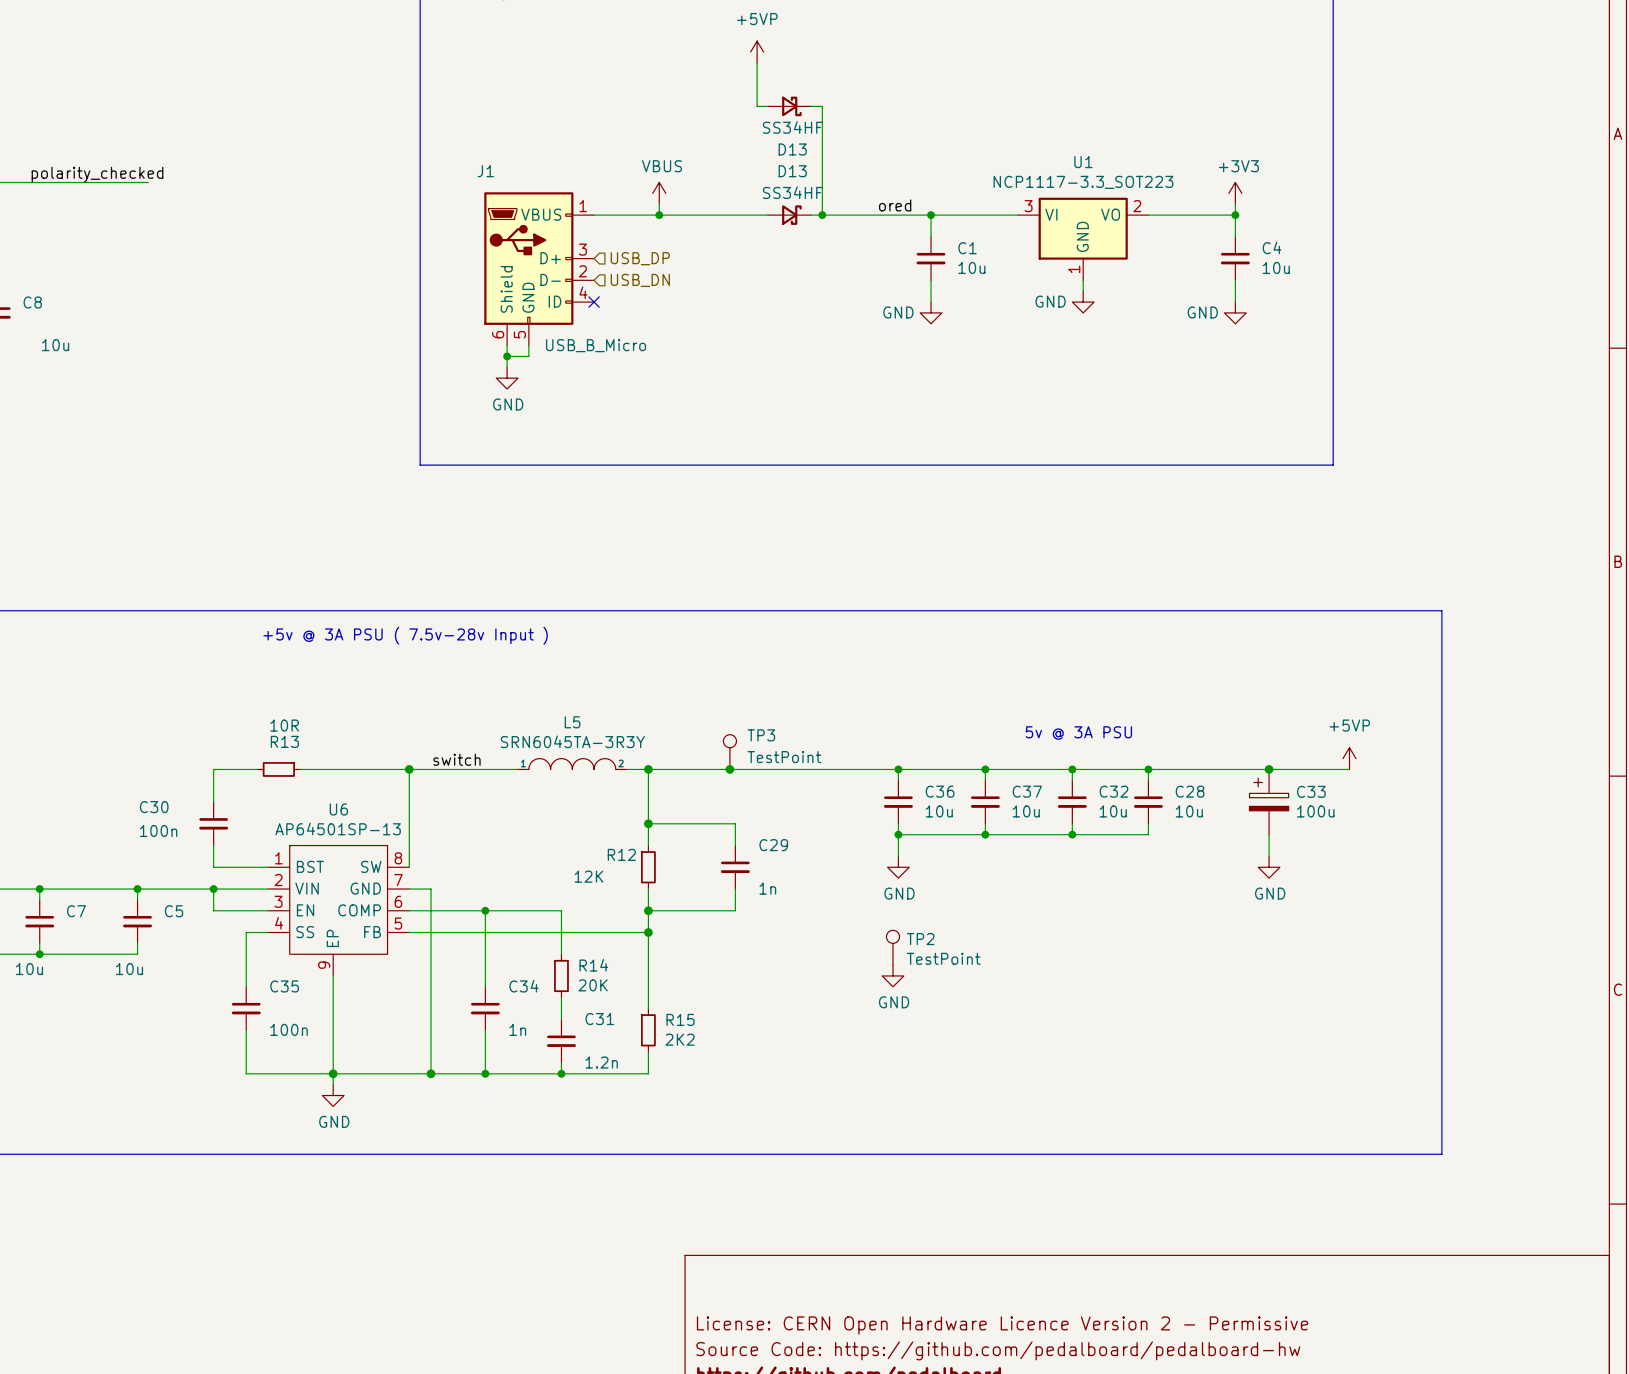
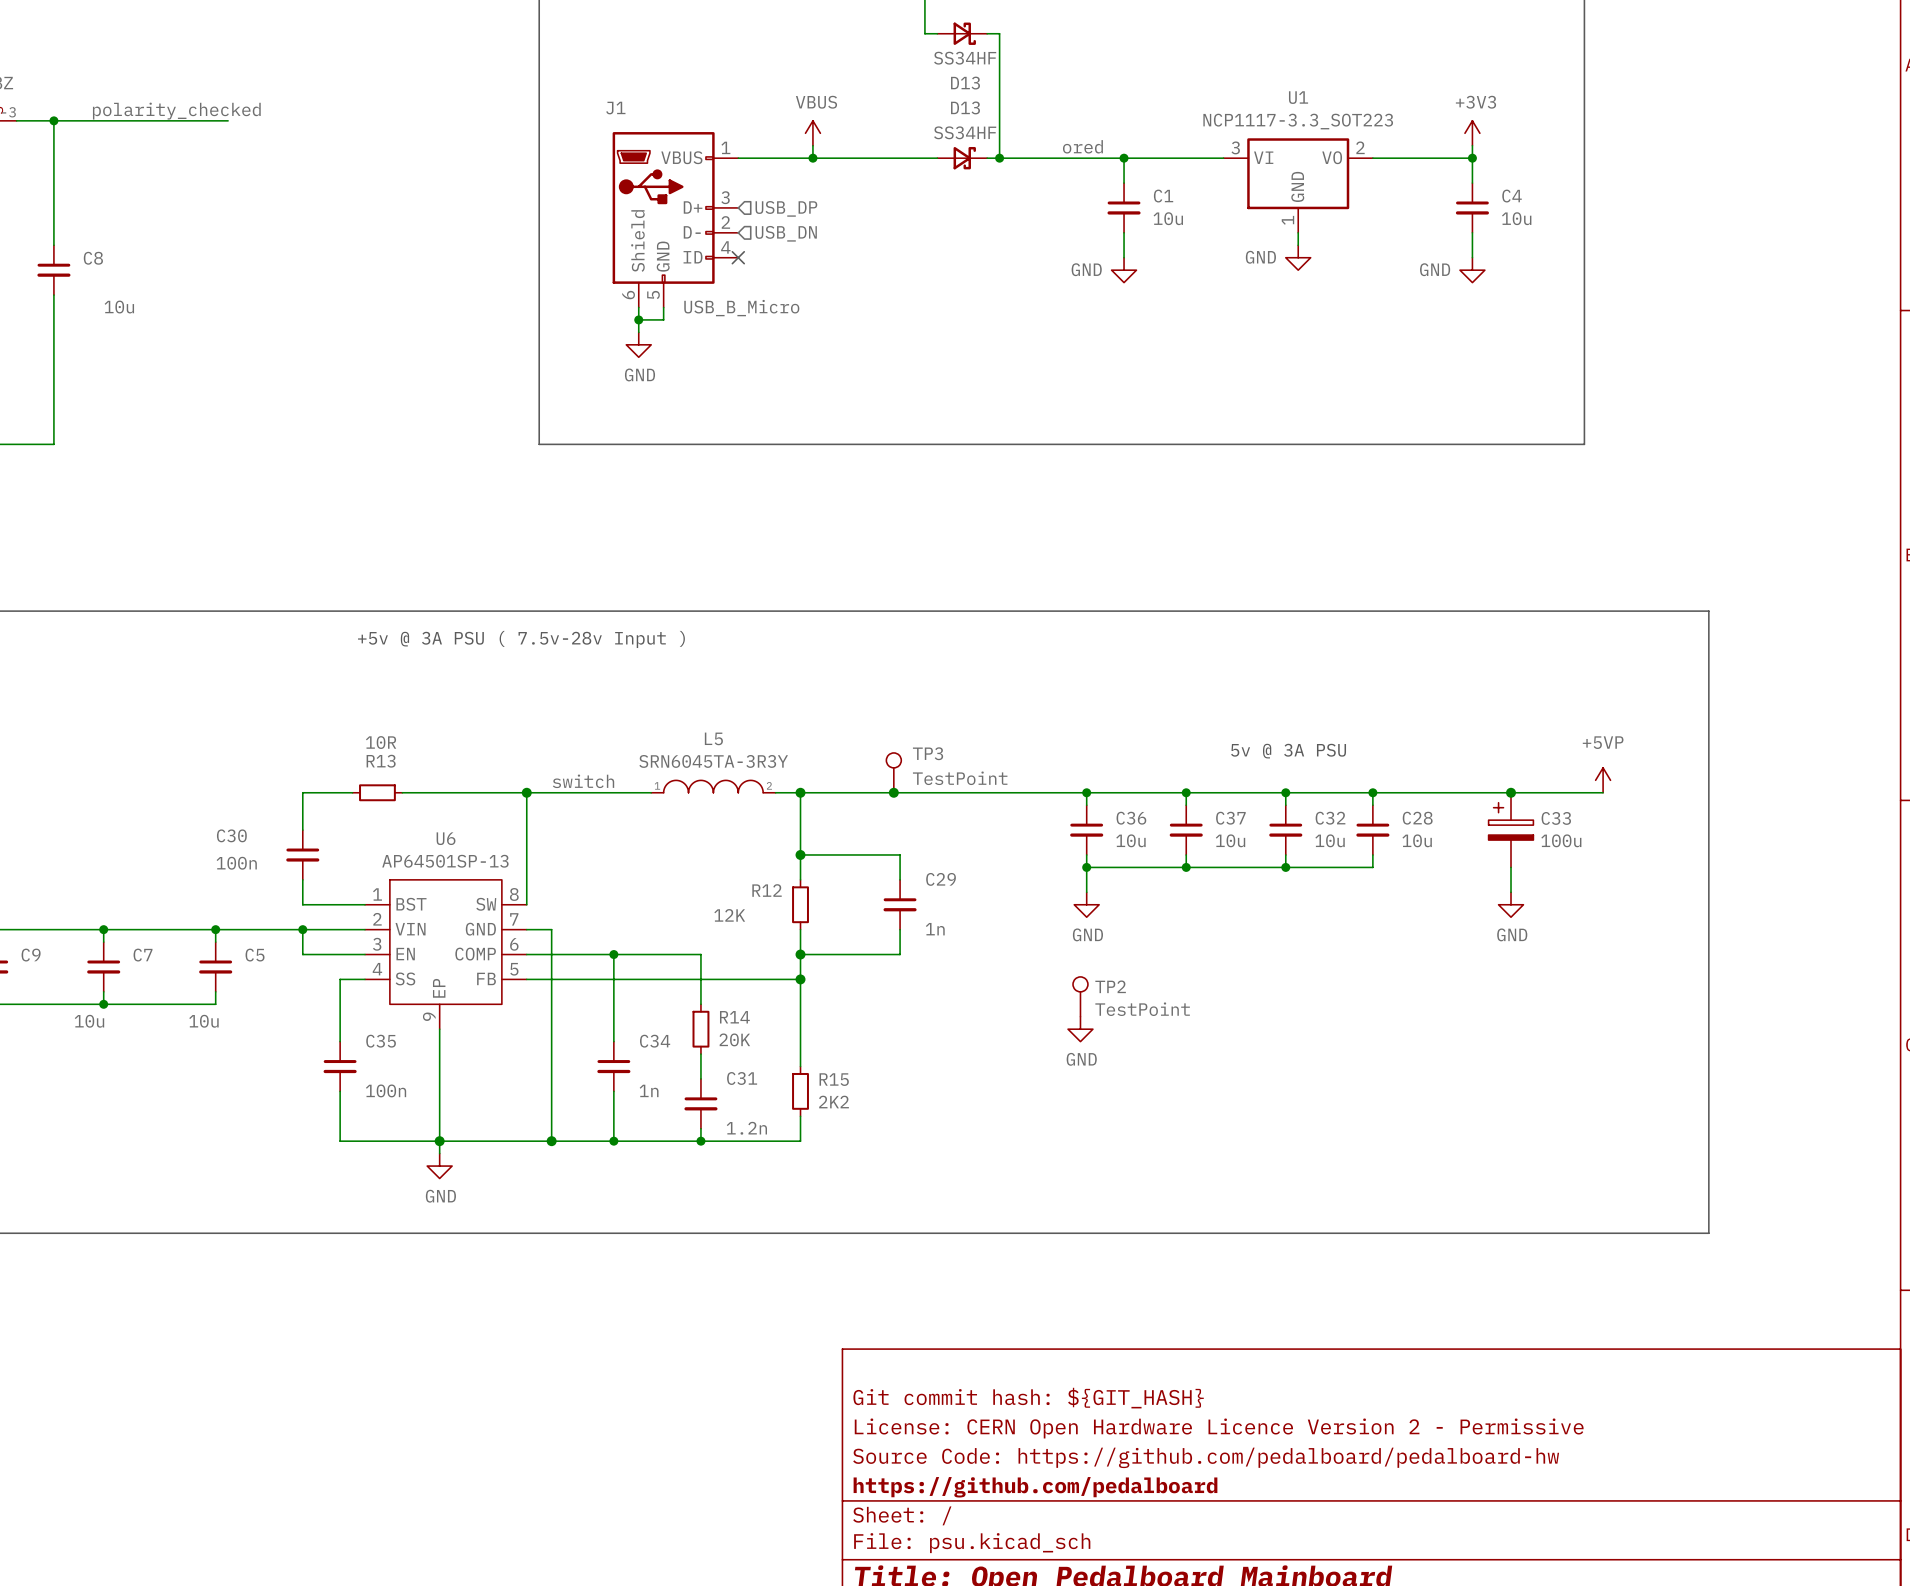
title block: none -> Git commit hash: ${GIT_HASH} (1028, 1398)

